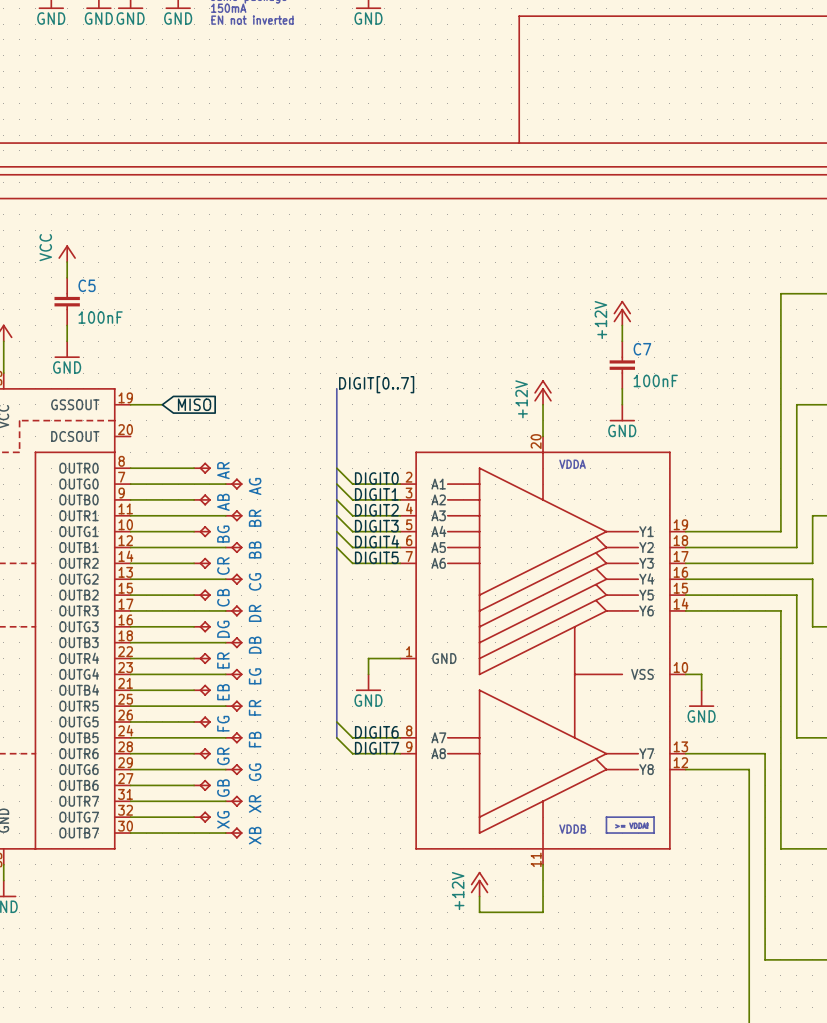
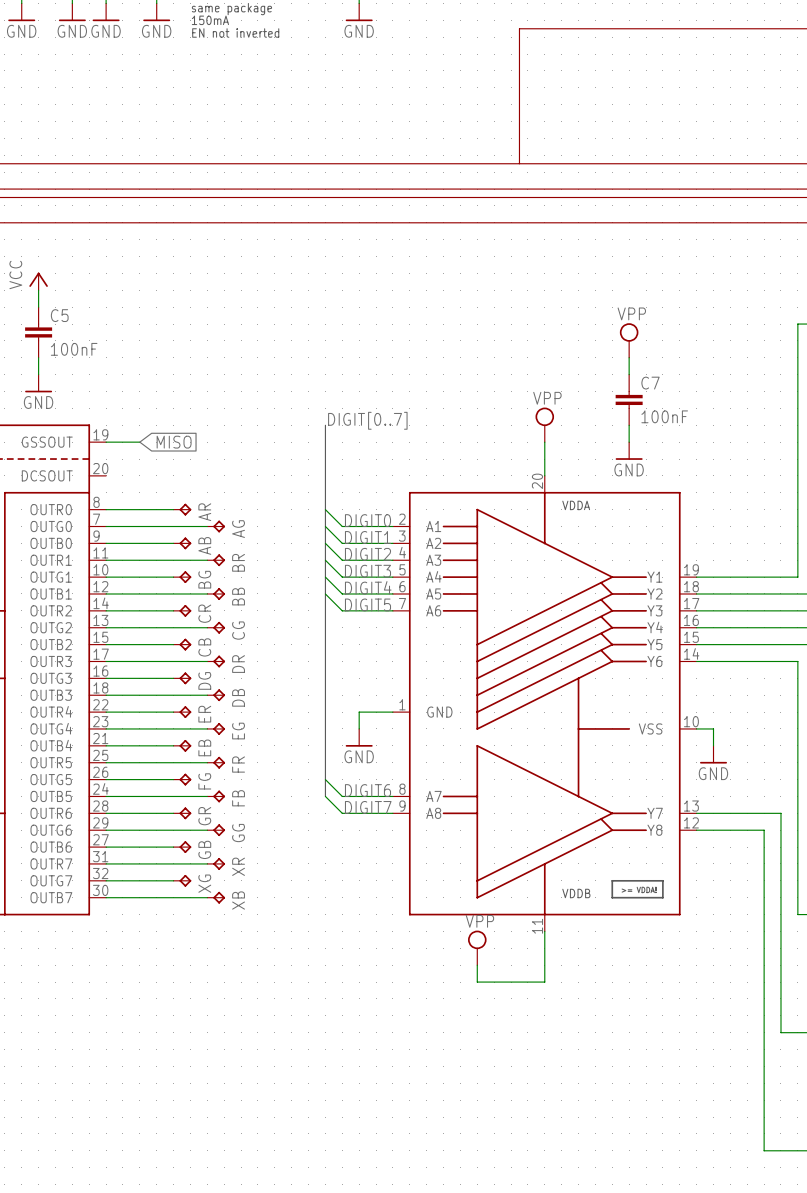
power symbol: +12V (622, 313) -> VPP (629, 340)
power symbol: +12V (543, 392) -> VPP (544, 424)
power symbol: +12V (479, 884) -> VPP (477, 947)

